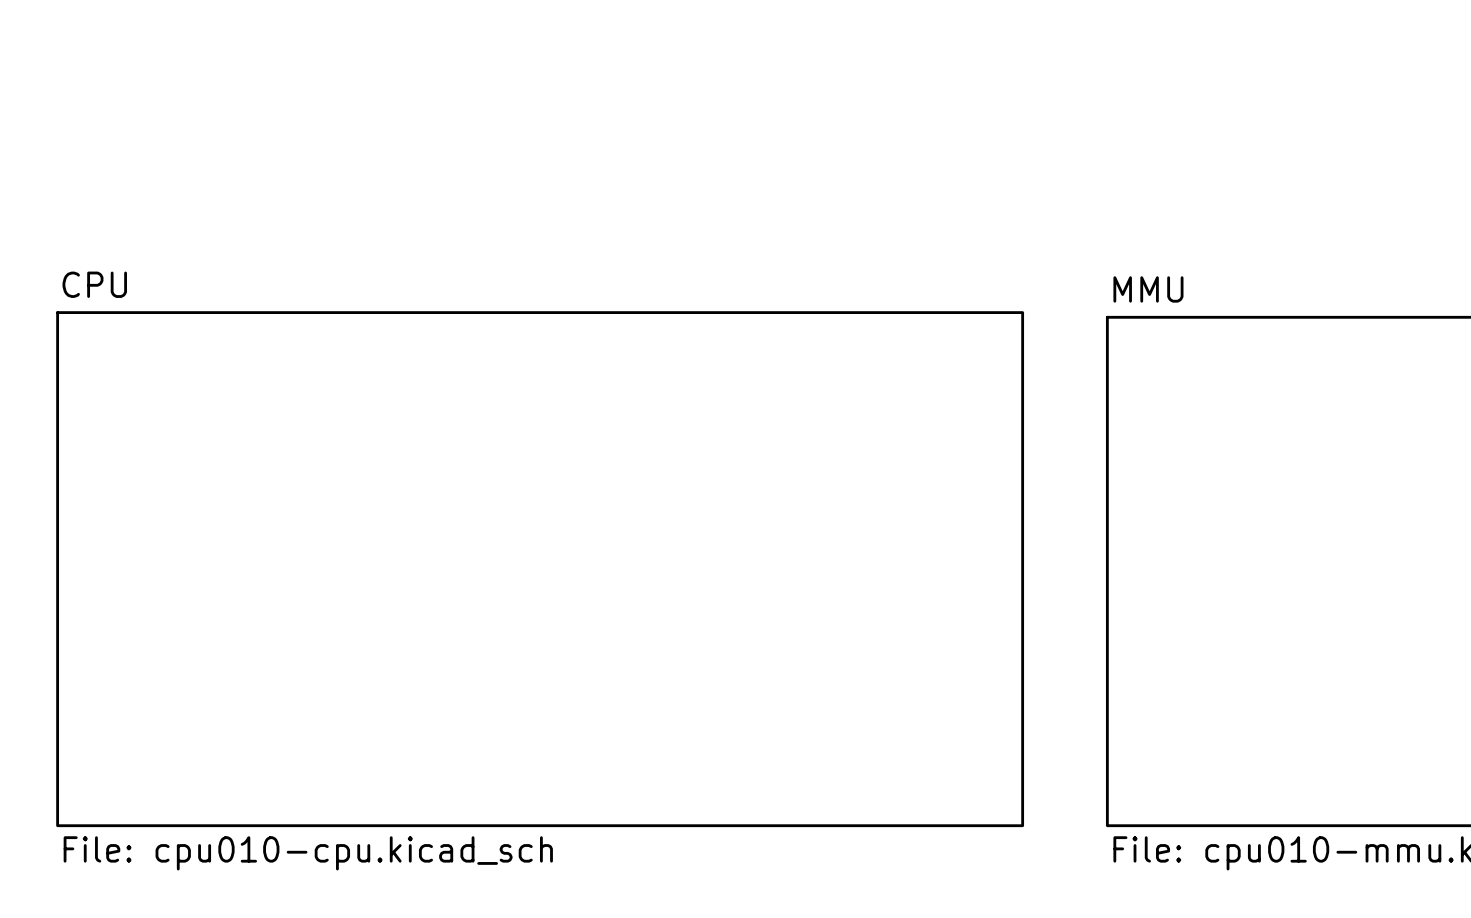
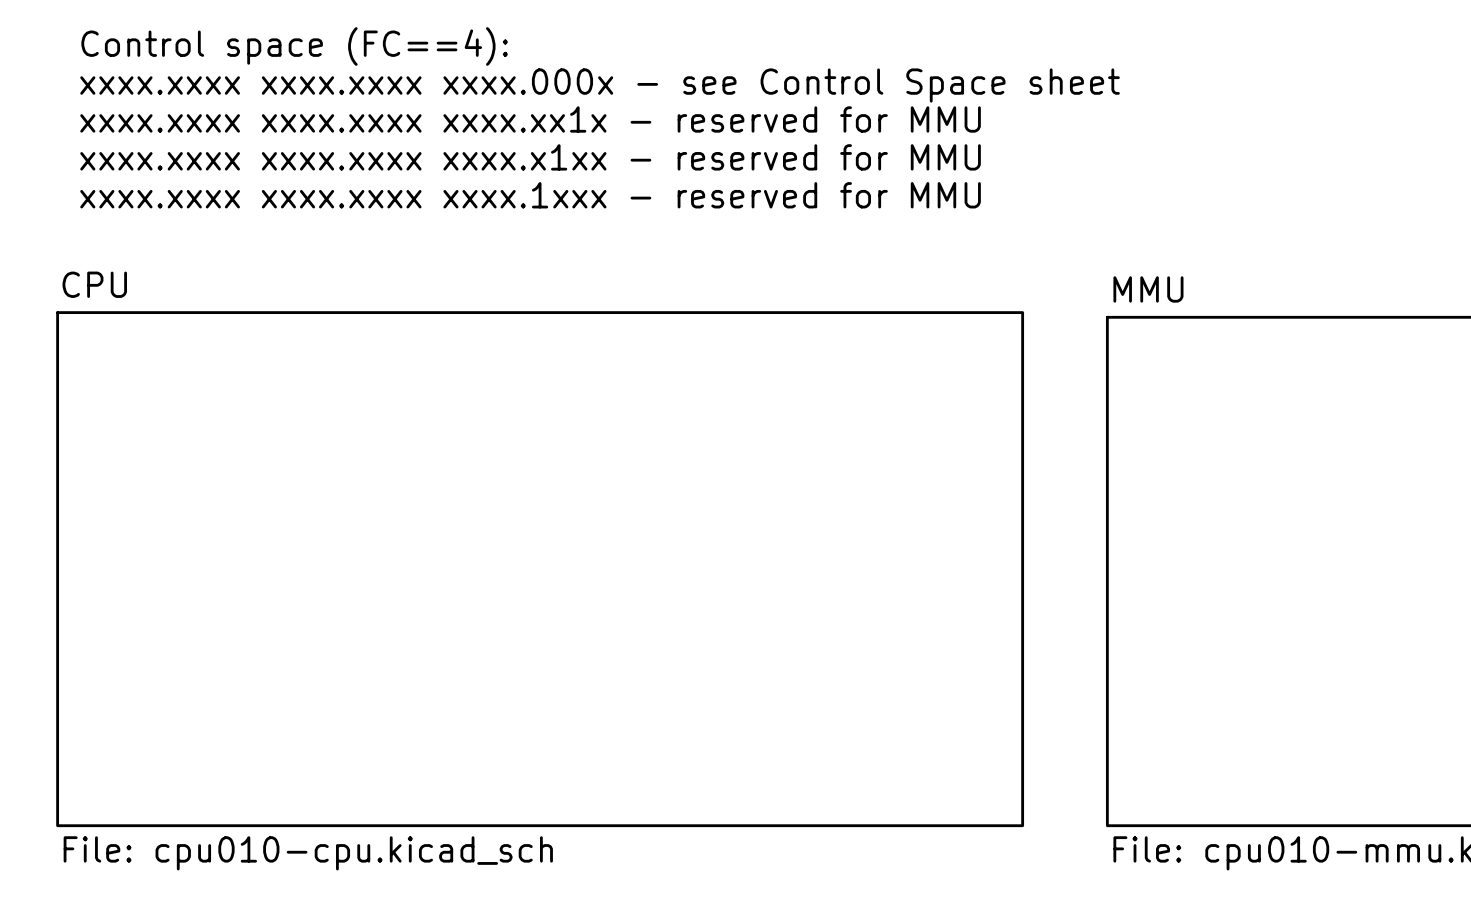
text: none -> Control space (FC==4): (294, 46)
text: none -> xxxx.xxxx xxxx.xxxx xxxx.000x - see Control Space sheet (600, 85)
text: none -> xxxx.xxxx xxxx.xxxx xxxx.xx1x - reserved for MMU (530, 119)
text: none -> xxxx.xxxx xxxx.xxxx xxxx.x1xx - reserved for MMU (530, 157)
text: none -> xxxx.xxxx xxxx.xxxx xxxx.1xxx - reserved for MMU (530, 195)

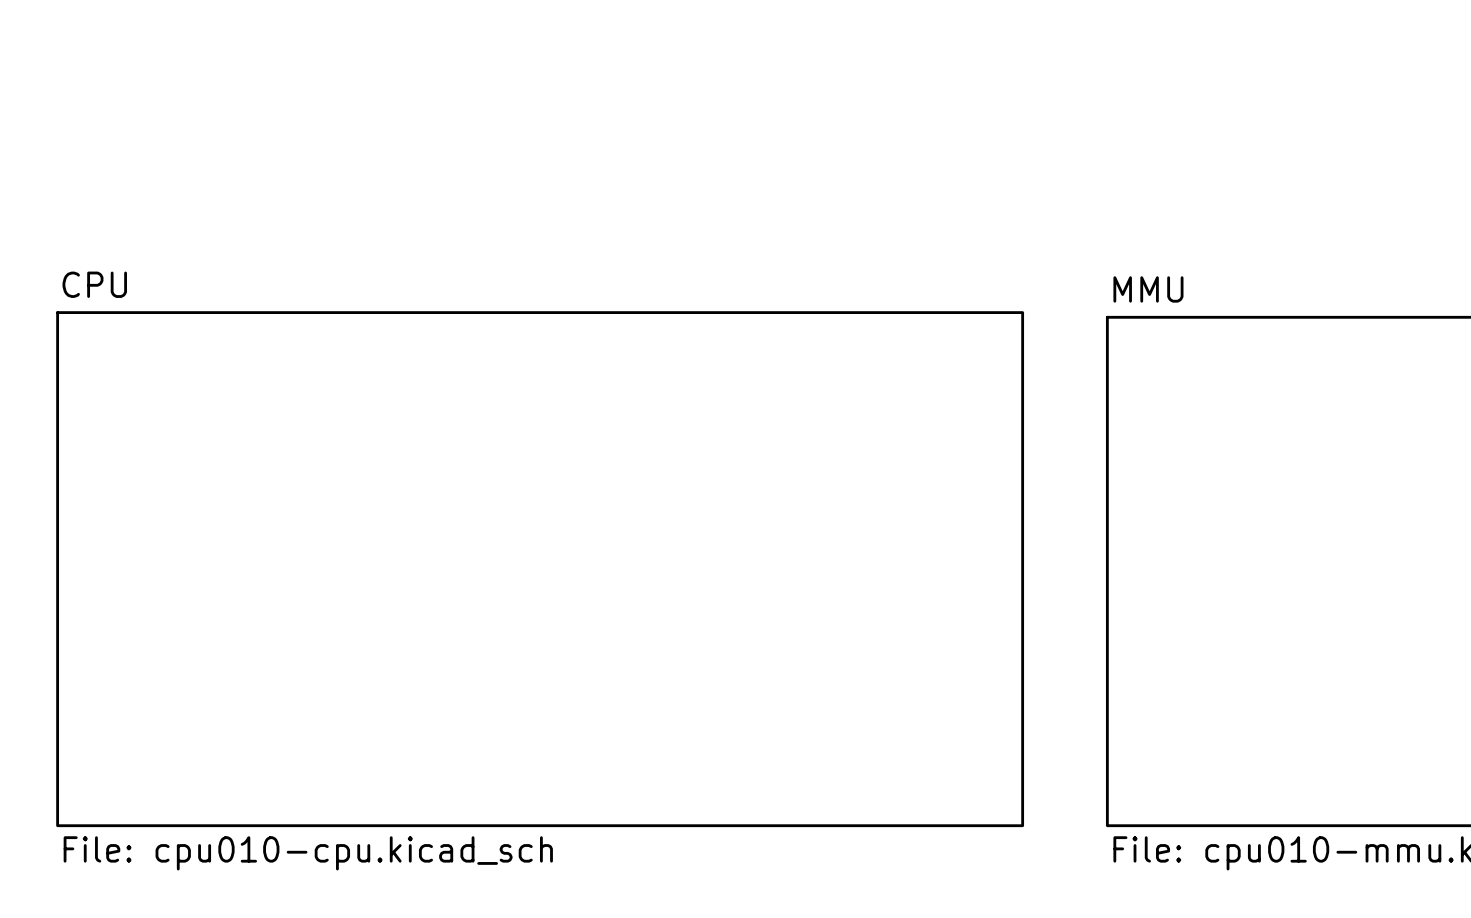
text: Control space (FC==4): (294, 46) -> none
text: xxxx.xxxx xxxx.xxxx xxxx.000x - see Control Space sheet (600, 85) -> none
text: xxxx.xxxx xxxx.xxxx xxxx.xx1x - reserved for MMU (530, 119) -> none
text: xxxx.xxxx xxxx.xxxx xxxx.x1xx - reserved for MMU (530, 157) -> none
text: xxxx.xxxx xxxx.xxxx xxxx.1xxx - reserved for MMU (530, 195) -> none

